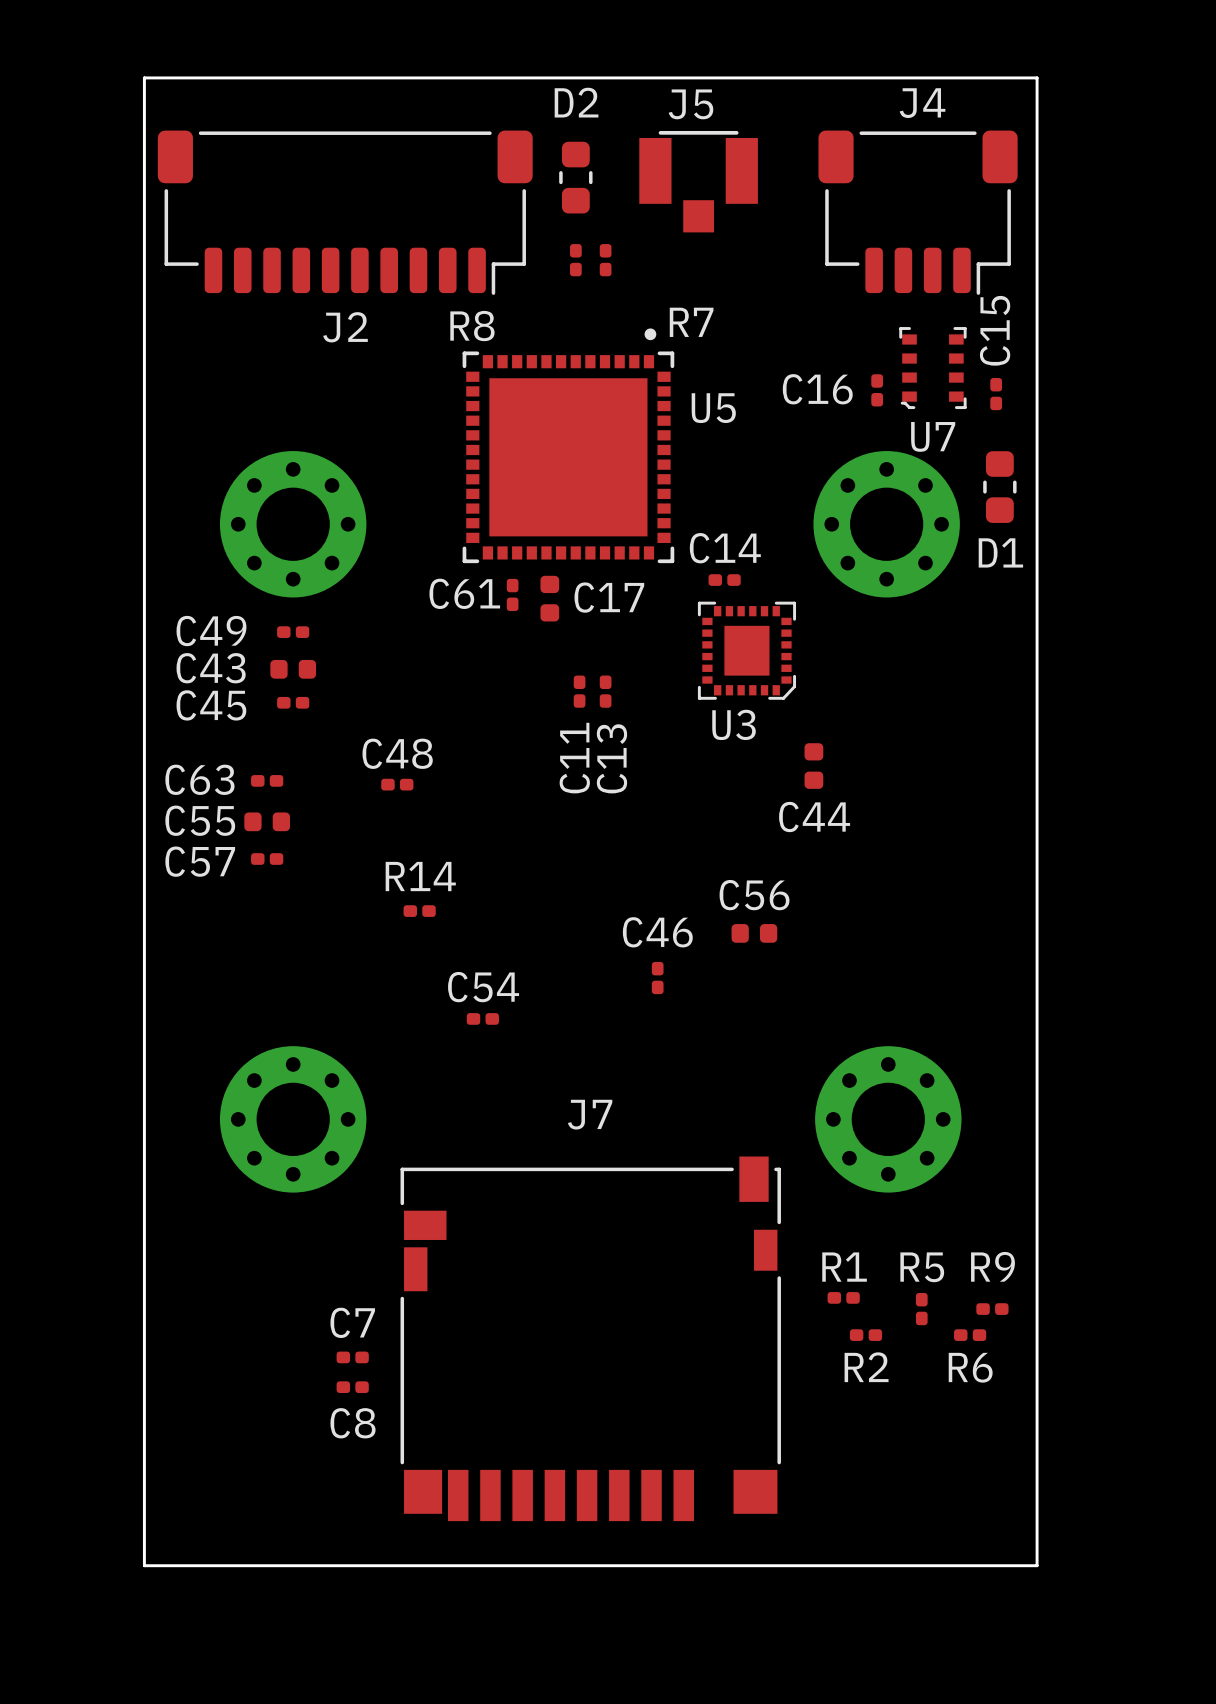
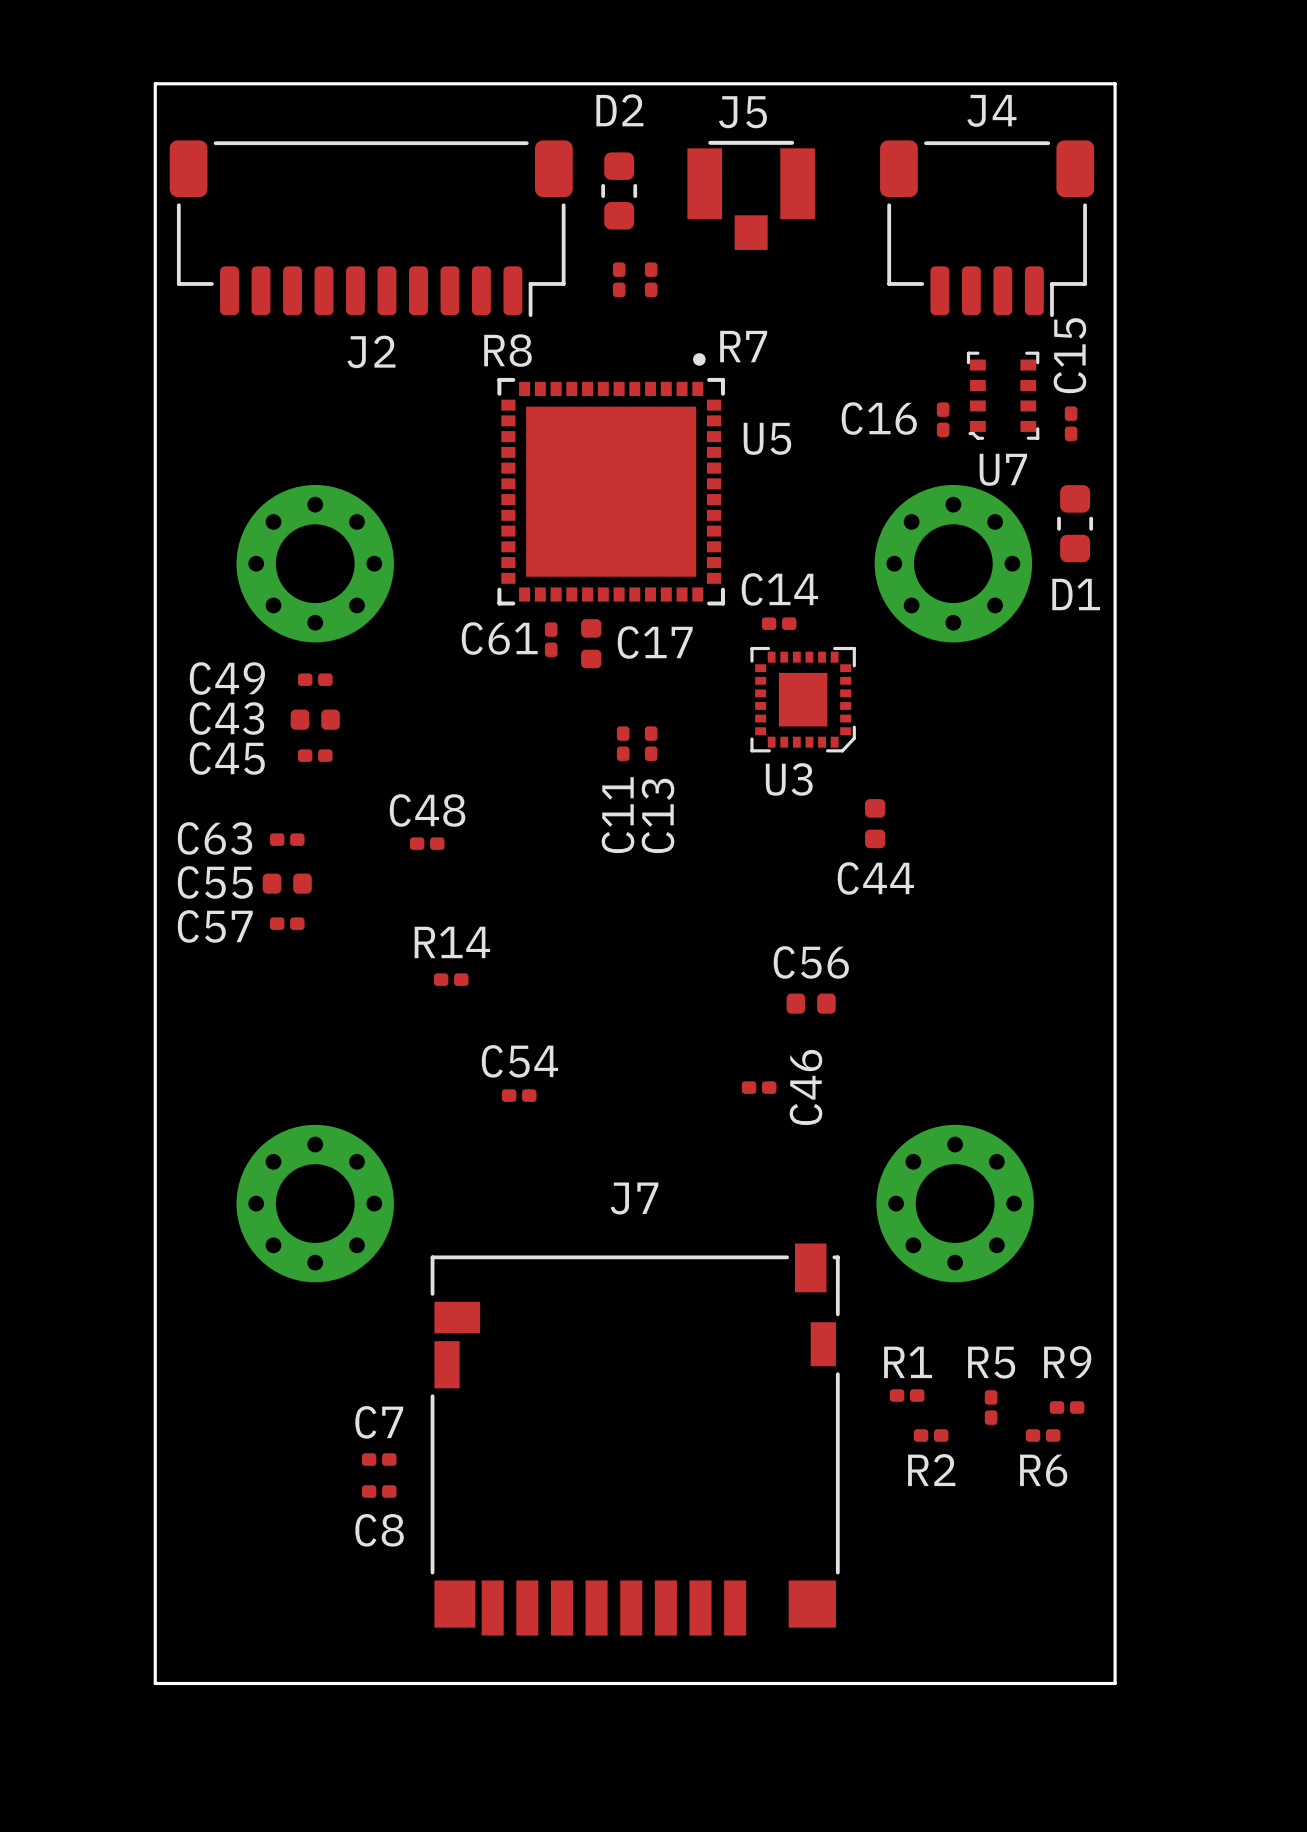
C46 rotation: 0° (657, 978) -> 90° clockwise (759, 1087)
C46 position: (657, 978) -> (759, 1087)

